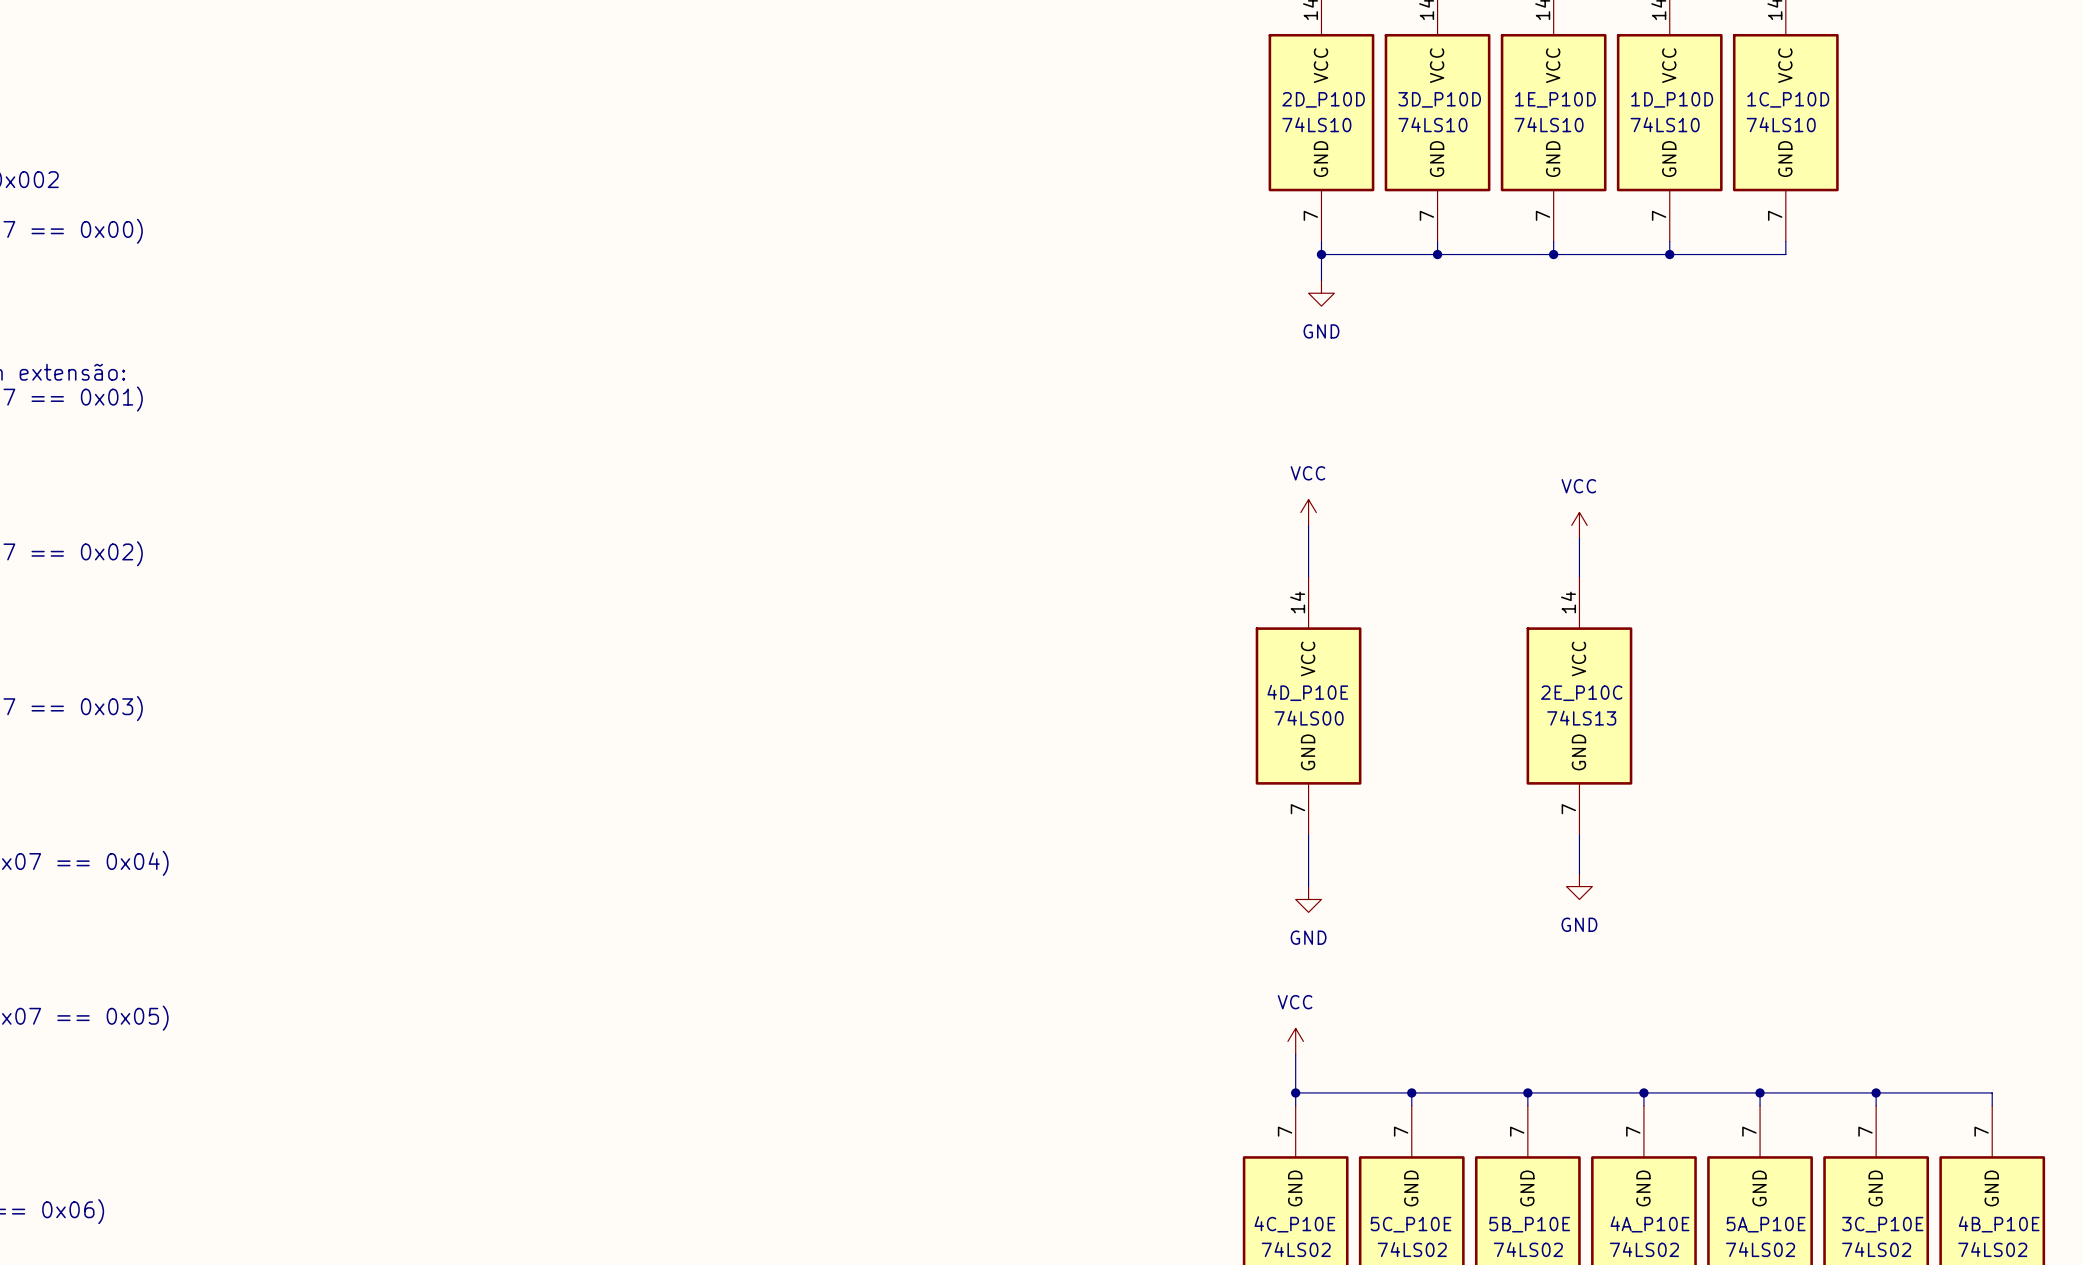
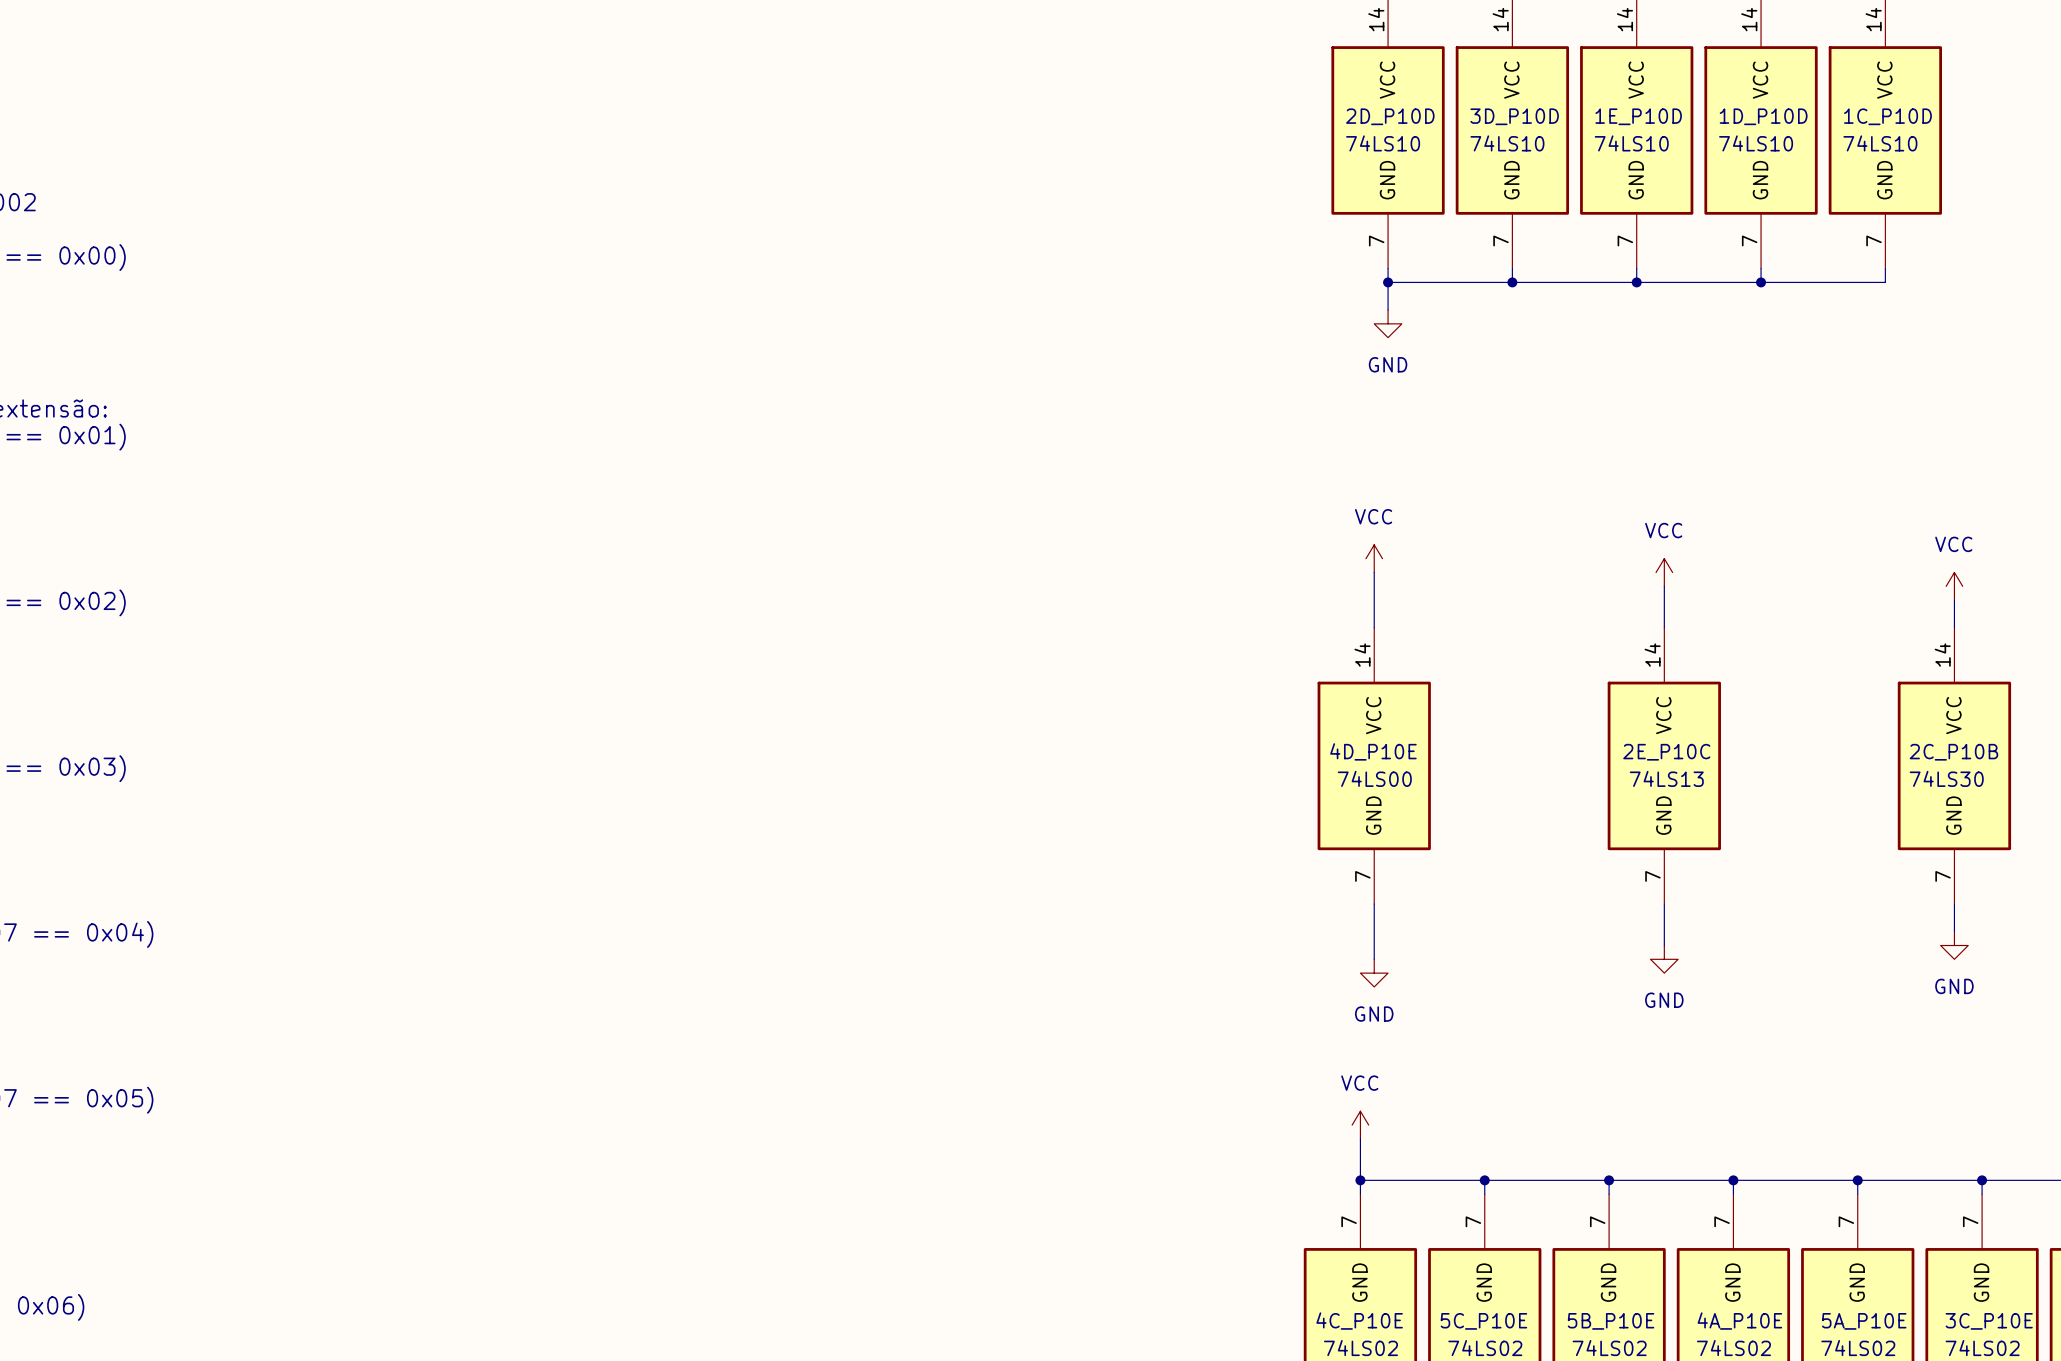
power symbol: none -> VCC (1954, 586)
wire: none -> (1954, 600) (1954, 627)
2C_P10B: none -> 74LS30 (1954, 765)
wire: none -> (1954, 904) (1954, 931)
power symbol: none -> GND (1954, 945)

